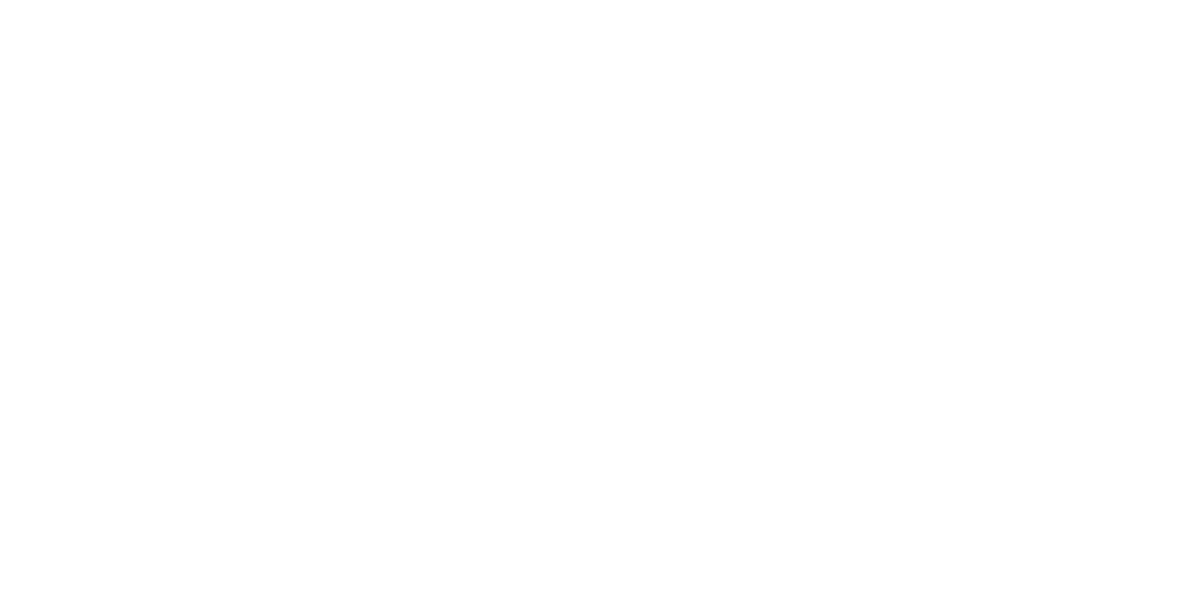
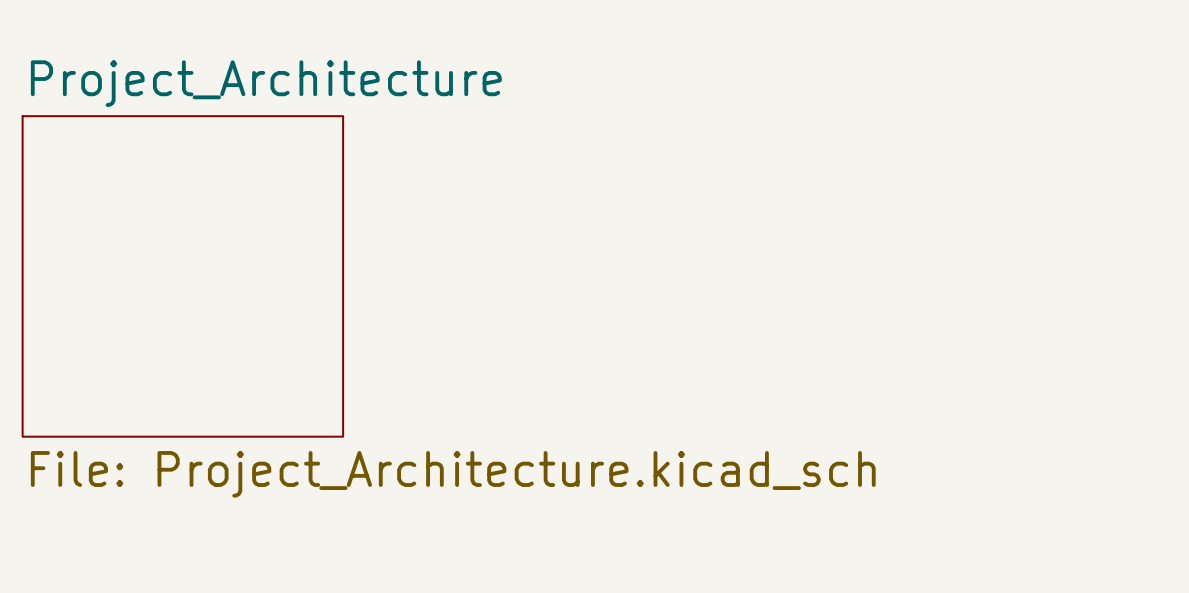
sheet Project_Architecture: none -> File: Project_Architecture.kicad_sch (182, 276)

